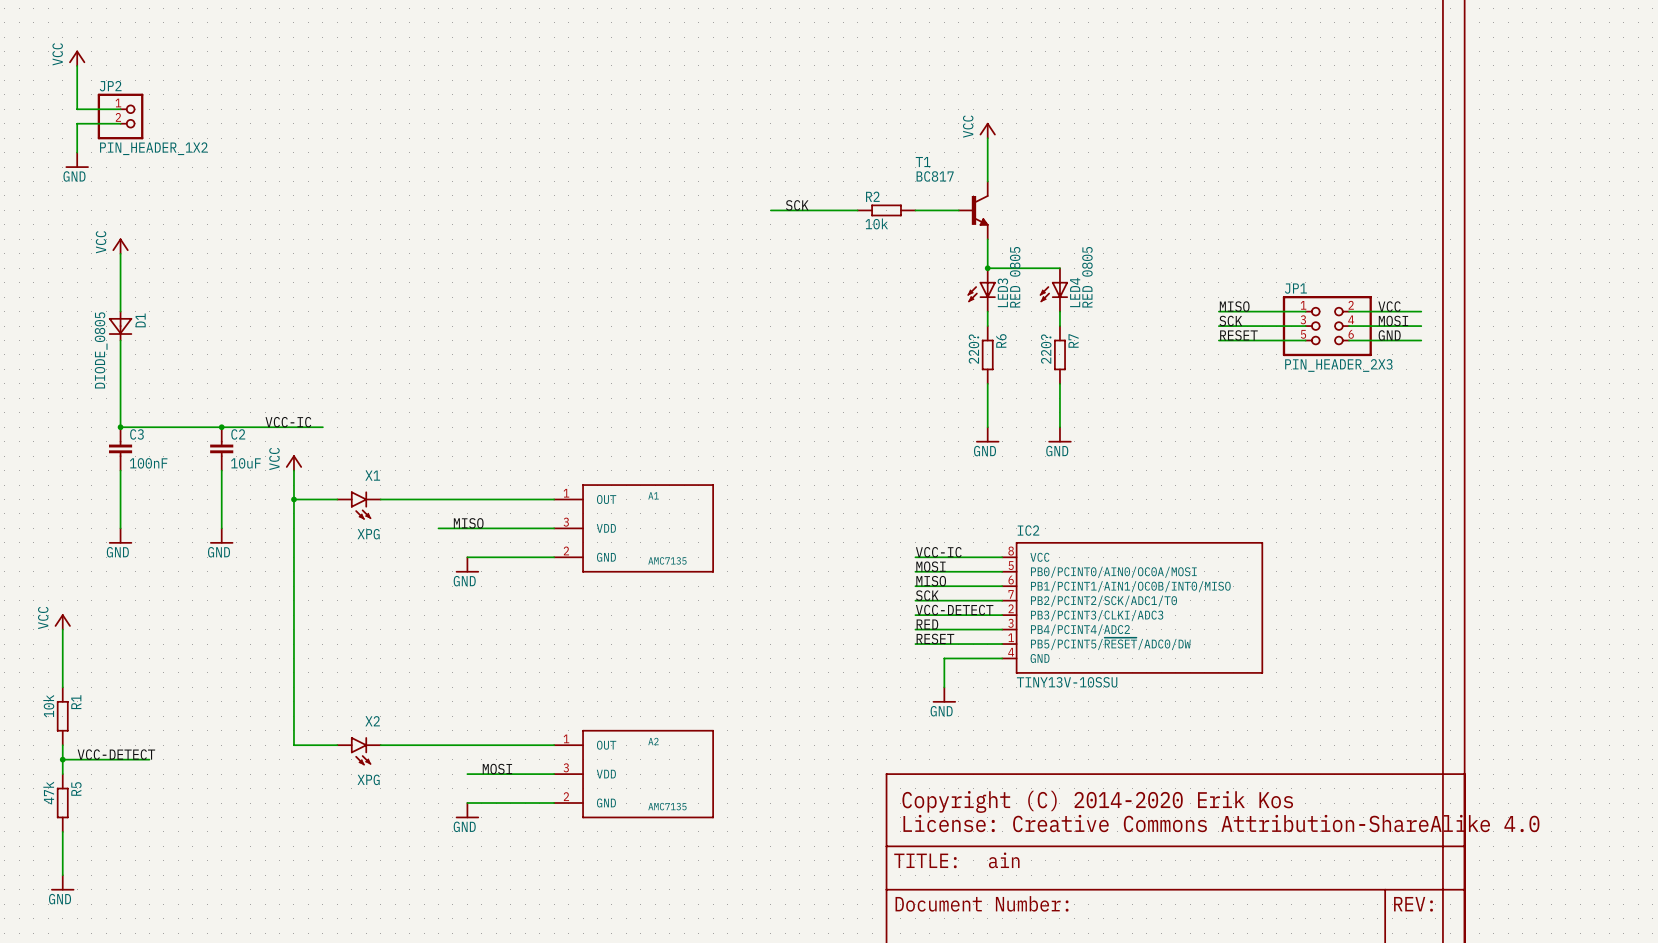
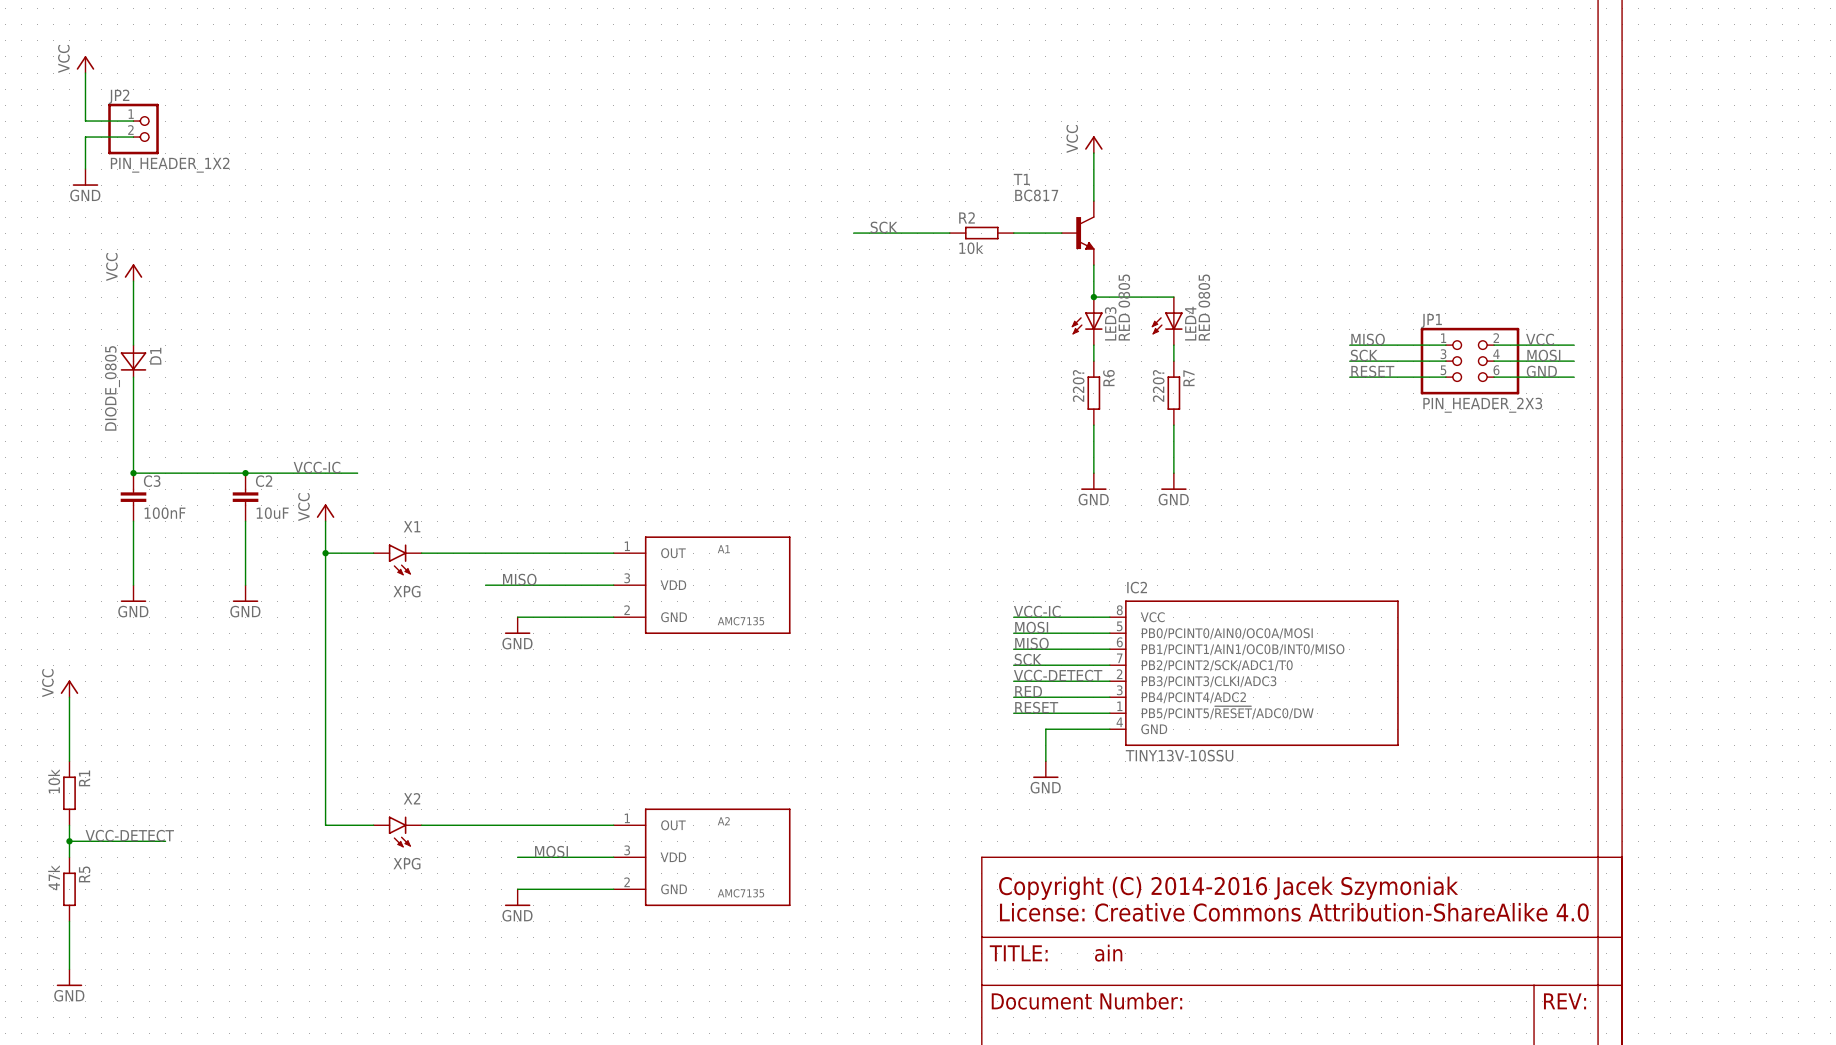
text: Copyright (C) 2014-2020 Erik Kos (1097, 801) -> Copyright (C) 2014-2016 Jacek Szymoniak (1228, 888)

